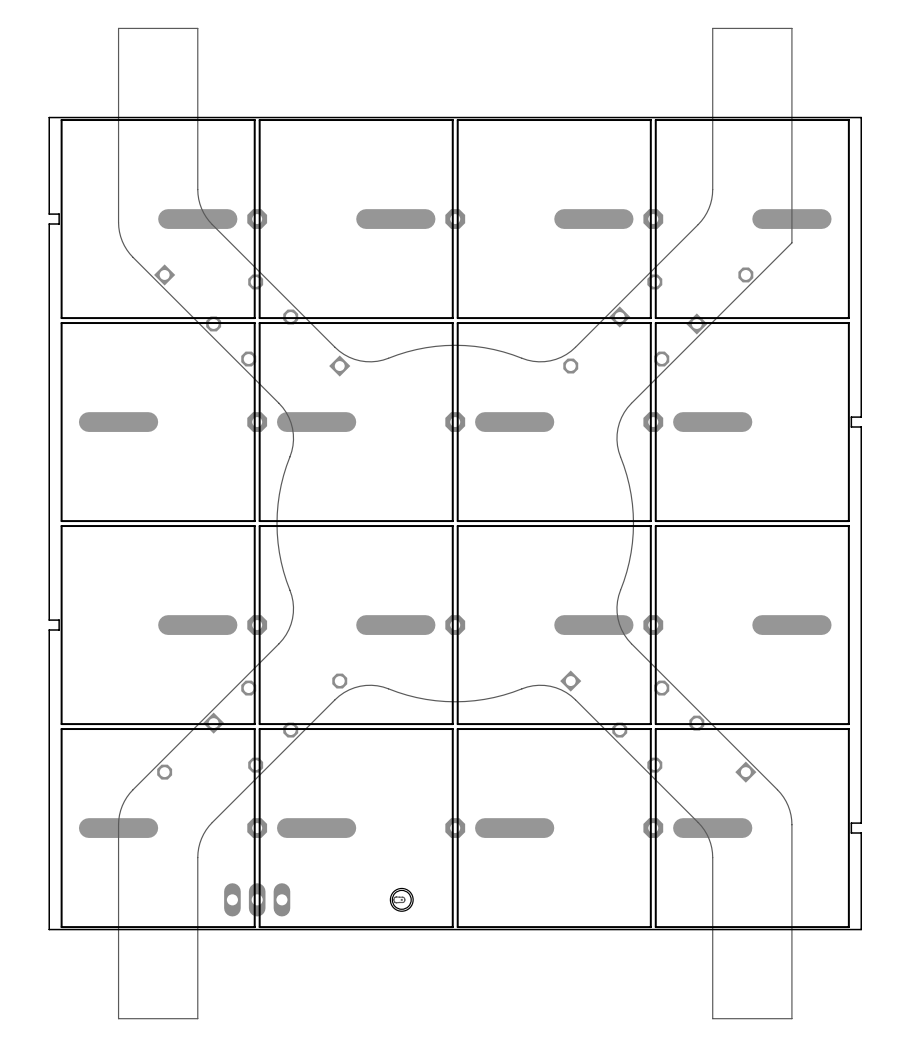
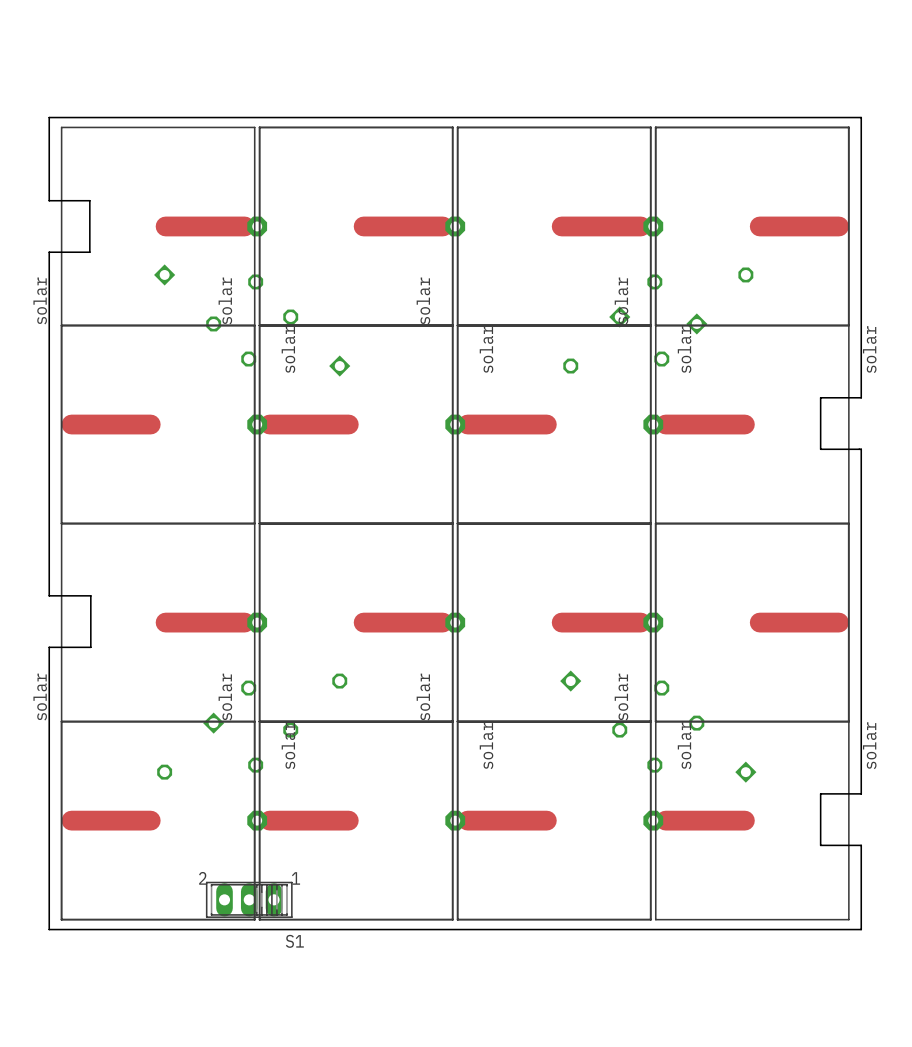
line: (118, 28) (118, 222) (122, 241) (133, 257) (282, 407) (291, 422) (293, 439) (281, 484) (276, 523) (281, 562) (292, 601) (292, 618) (288, 629) (279, 643) (133, 789) (120, 810) (118, 824) (118, 1018) (197, 1018) (197, 857) (203, 834) (212, 822) (339, 695) (354, 687) (371, 685) (416, 697) (445, 701) (484, 699) (538, 685) (555, 687) (571, 695) (698, 822) (708, 838) (712, 857) (712, 1018) (791, 1018) (791, 824) (788, 805) (777, 789) (627, 639) (619, 624) (616, 607) (629, 562) (633, 523) (629, 484) (617, 445) (617, 428) (621, 417) (631, 403) (791, 242) (791, 28) (712, 28) (712, 189) (706, 212) (698, 224) (571, 351) (555, 359) (538, 361) (493, 349) (465, 345) (426, 347) (371, 361) (354, 359) (339, 351) (212, 224) (201, 208) (197, 189) (197, 28) (118, 28) -> none
part footprint: [60, 119, 256, 320] -> [60, 126, 256, 327]
part footprint: [247, 119, 454, 320] -> [247, 126, 454, 327]
part footprint: [445, 119, 652, 320] -> [445, 126, 652, 327]
part footprint: [643, 119, 850, 320] -> [643, 126, 850, 327]
board edge: (49, 200) (49, 214) (59, 214) (59, 223) (49, 223) (49, 252) -> (49, 200) (89, 200) (89, 252) (49, 252)
part footprint: [60, 322, 268, 523] -> [60, 324, 268, 525]
part footprint: [258, 322, 466, 523] -> [258, 324, 466, 525]
part footprint: [456, 322, 664, 523] -> [456, 324, 664, 525]
part footprint: [654, 322, 850, 523] -> [655, 324, 850, 525]
board edge: (861, 397) (861, 417) (851, 417) (851, 427) (861, 427) (861, 449) -> (861, 397) (820, 397) (820, 449) (861, 449)
part footprint: [60, 525, 256, 726] -> [60, 522, 256, 723]
part footprint: [247, 525, 454, 726] -> [247, 522, 454, 723]
part footprint: [445, 525, 652, 726] -> [445, 522, 652, 723]
part footprint: [643, 525, 850, 726] -> [643, 522, 850, 723]
board edge: (49, 595) (49, 620) (59, 620) (59, 630) (49, 630) (49, 647) -> (49, 595) (90, 595) (90, 647) (49, 647)
part footprint: [60, 728, 268, 929] -> [60, 720, 268, 921]
part footprint: [258, 728, 466, 929] -> [258, 720, 466, 921]
part footprint: [456, 728, 664, 929] -> [456, 720, 664, 921]
part footprint: [654, 728, 850, 929] -> [655, 720, 850, 921]
board edge: (861, 793) (861, 823) (851, 823) (851, 833) (861, 833) (861, 845) -> (861, 793) (820, 793) (820, 845) (861, 845)
S1 side: bottom (257, 899) -> top (249, 899)
part: (401, 899) -> none

